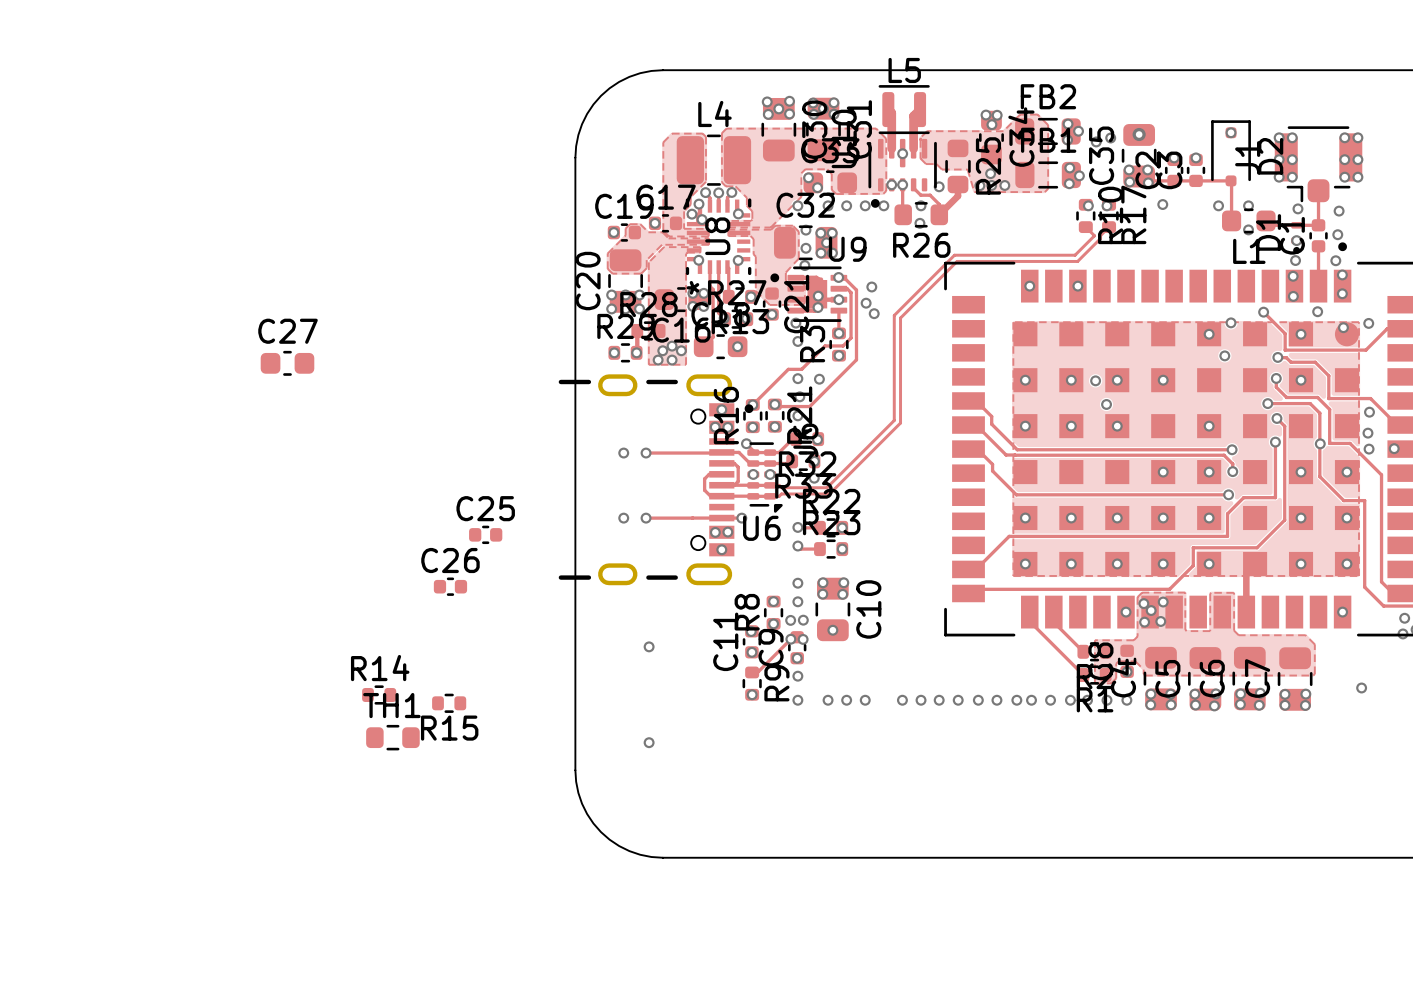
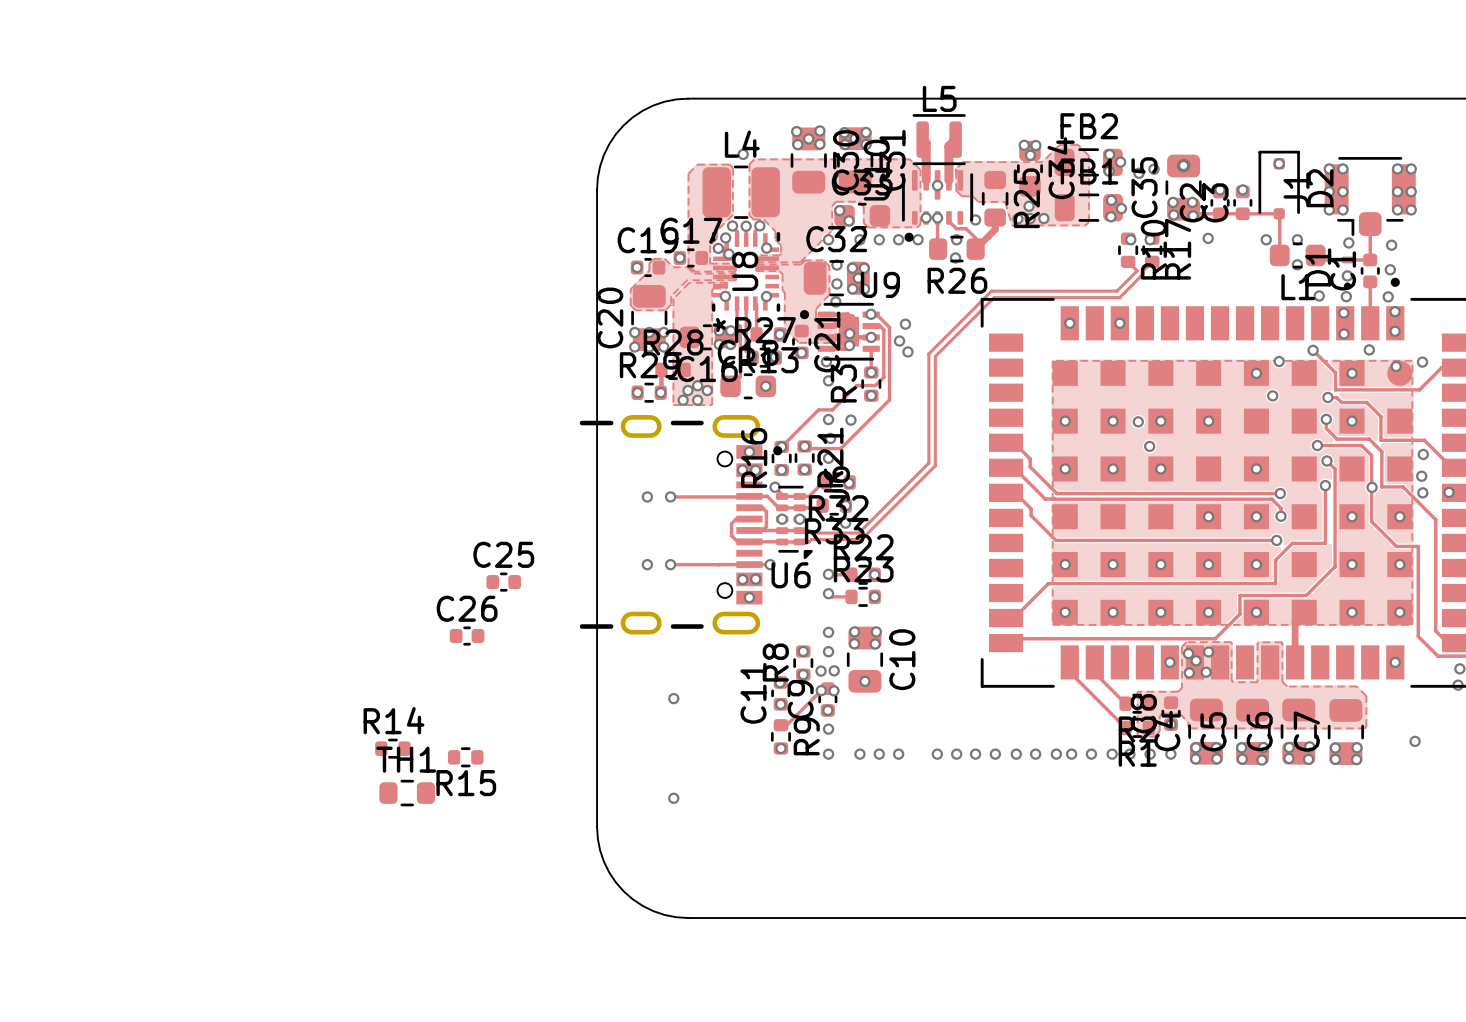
via: none -> (743, 154)
via: none -> (1319, 295)
C27: (287, 363) -> none

